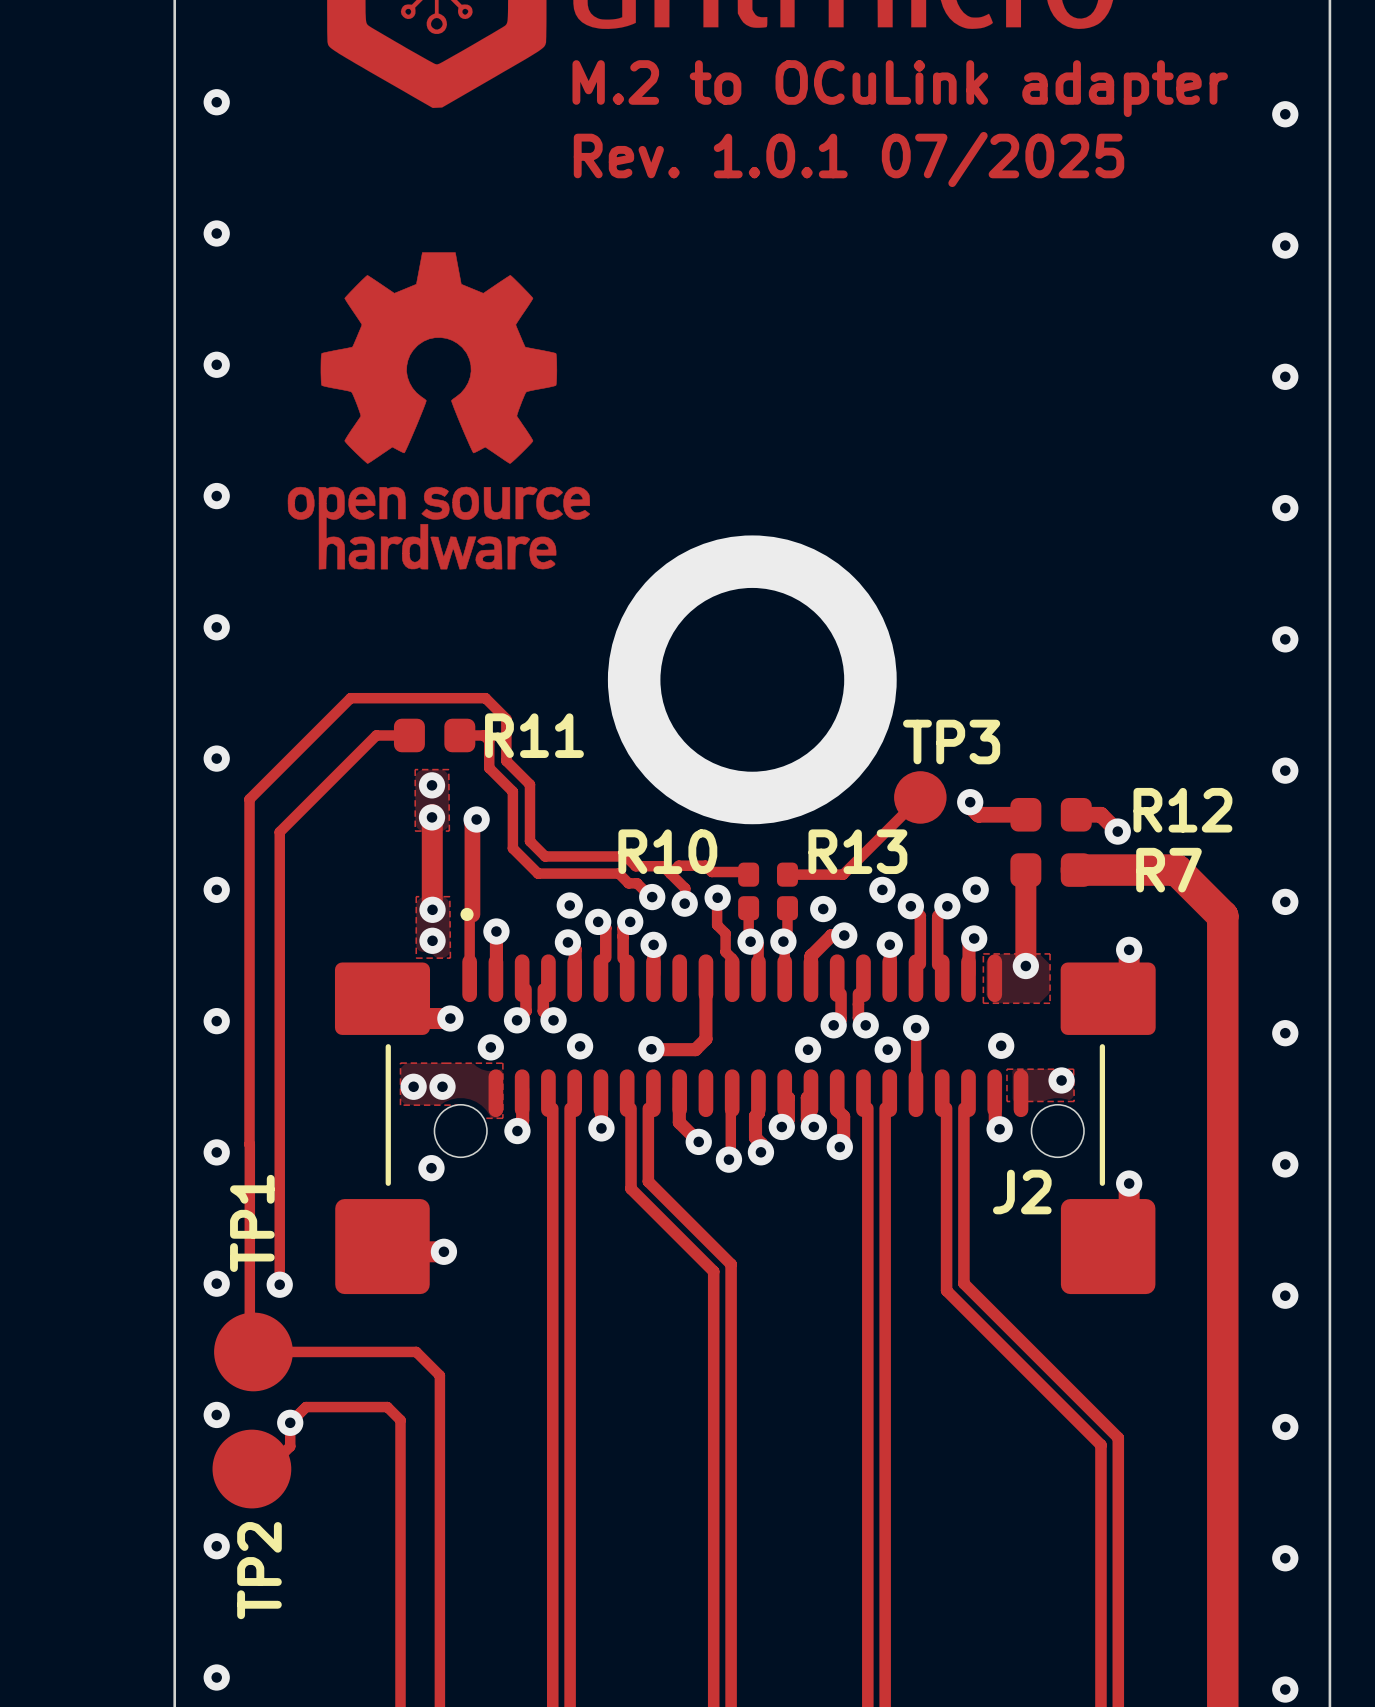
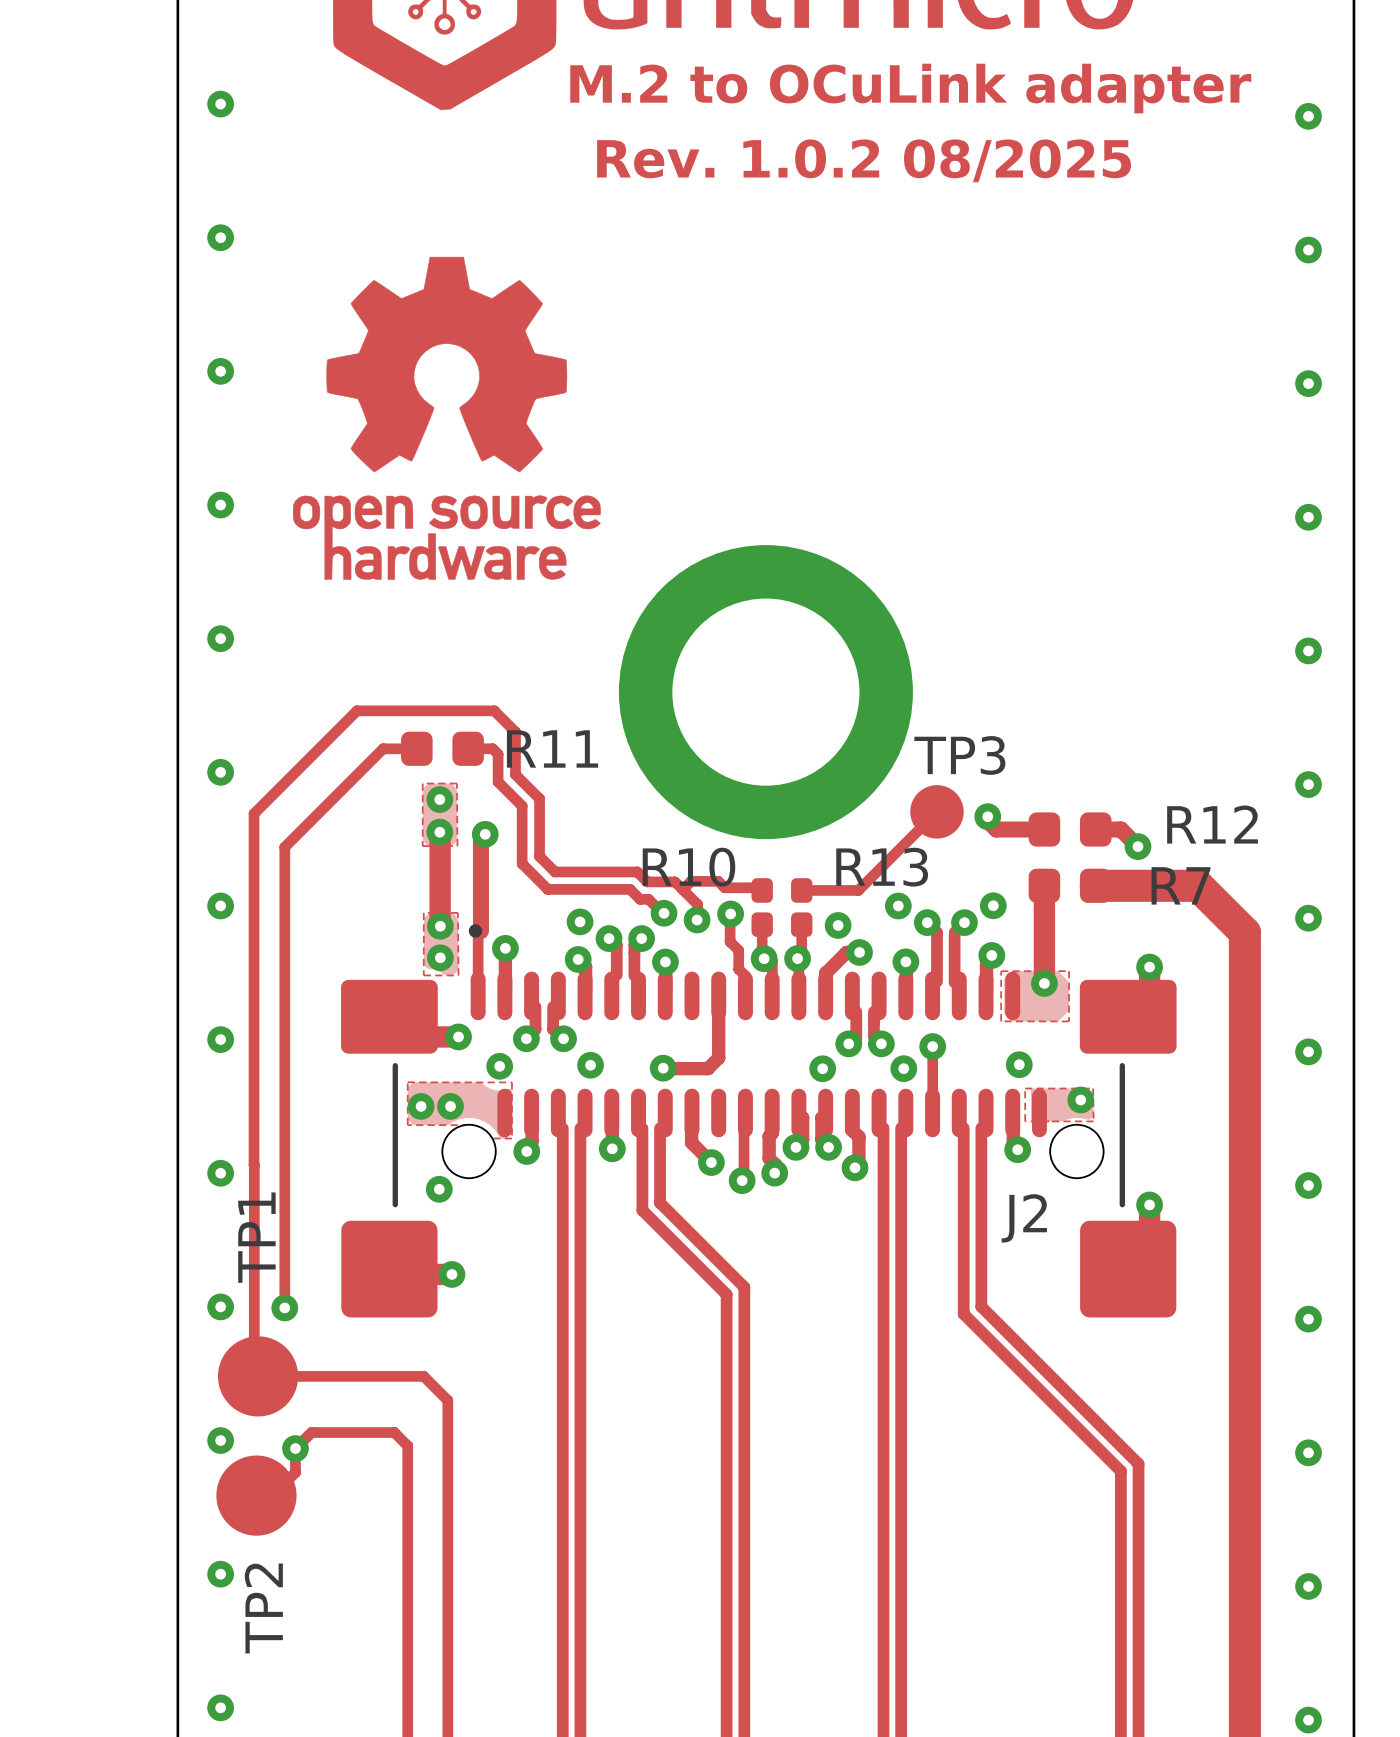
text: Rev. 1.0.1 07/2025 (849, 159) -> Rev. 1.0.2 08/2025 (864, 160)

